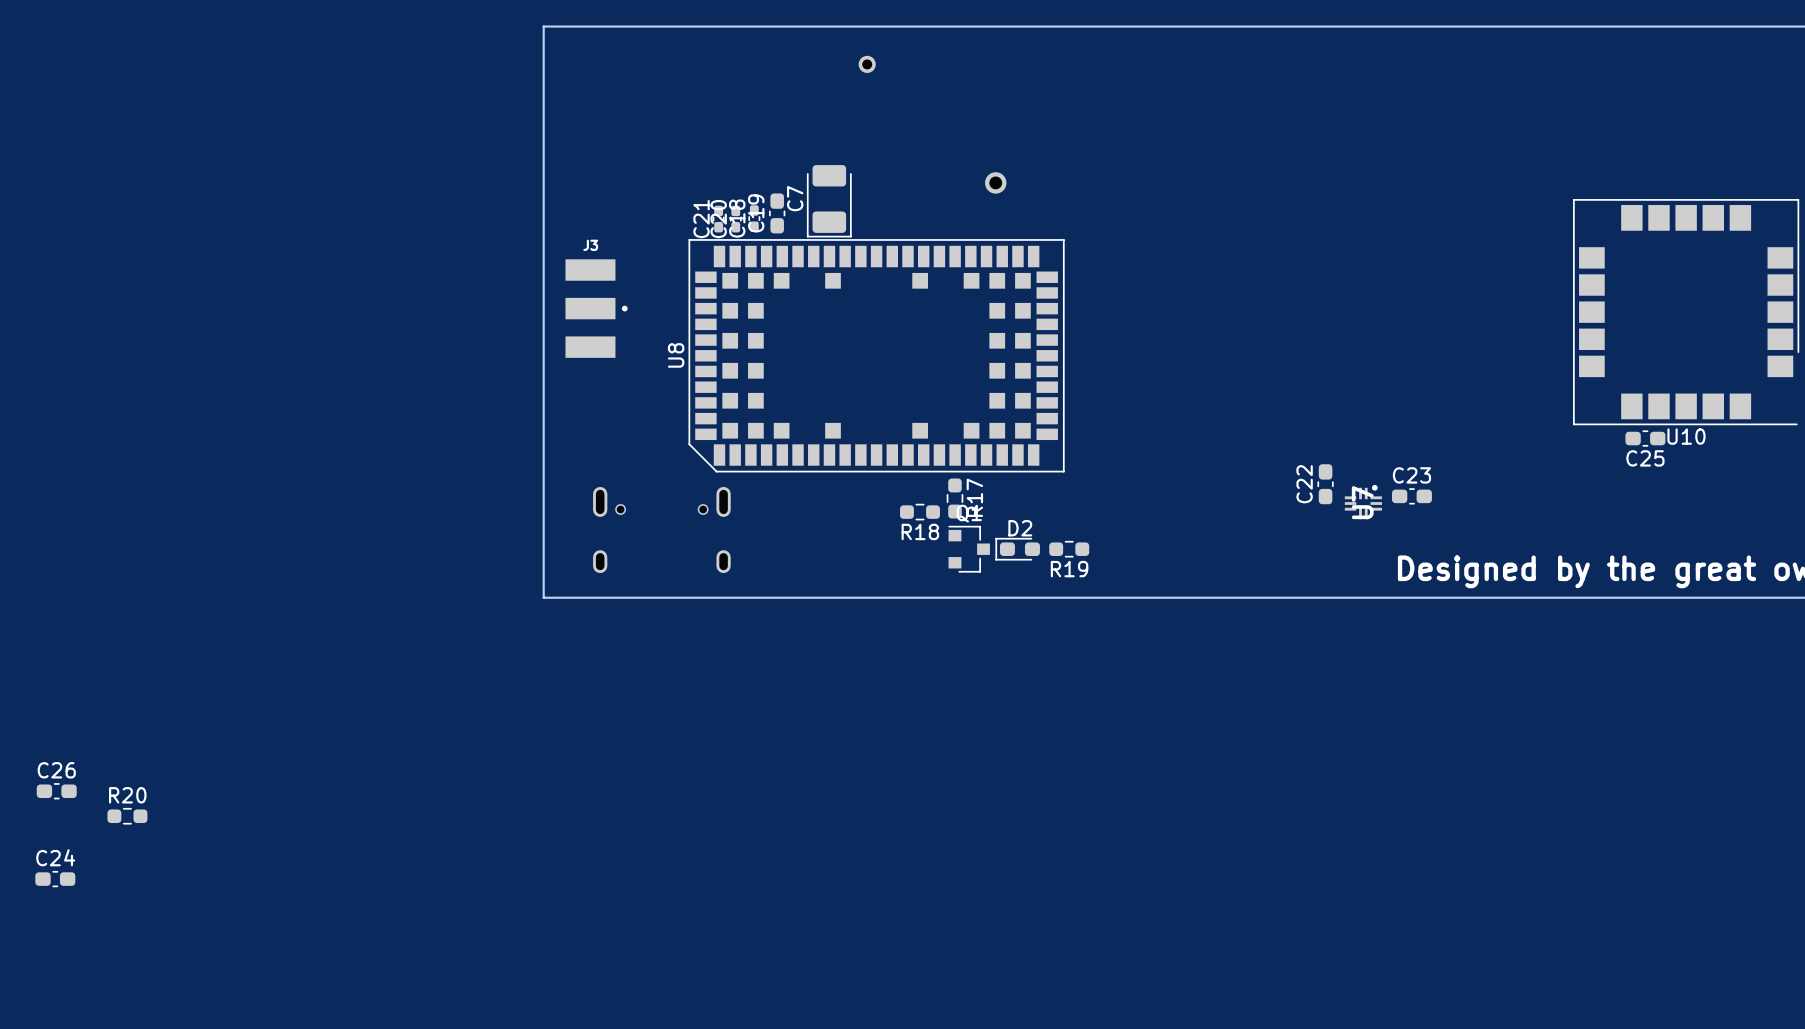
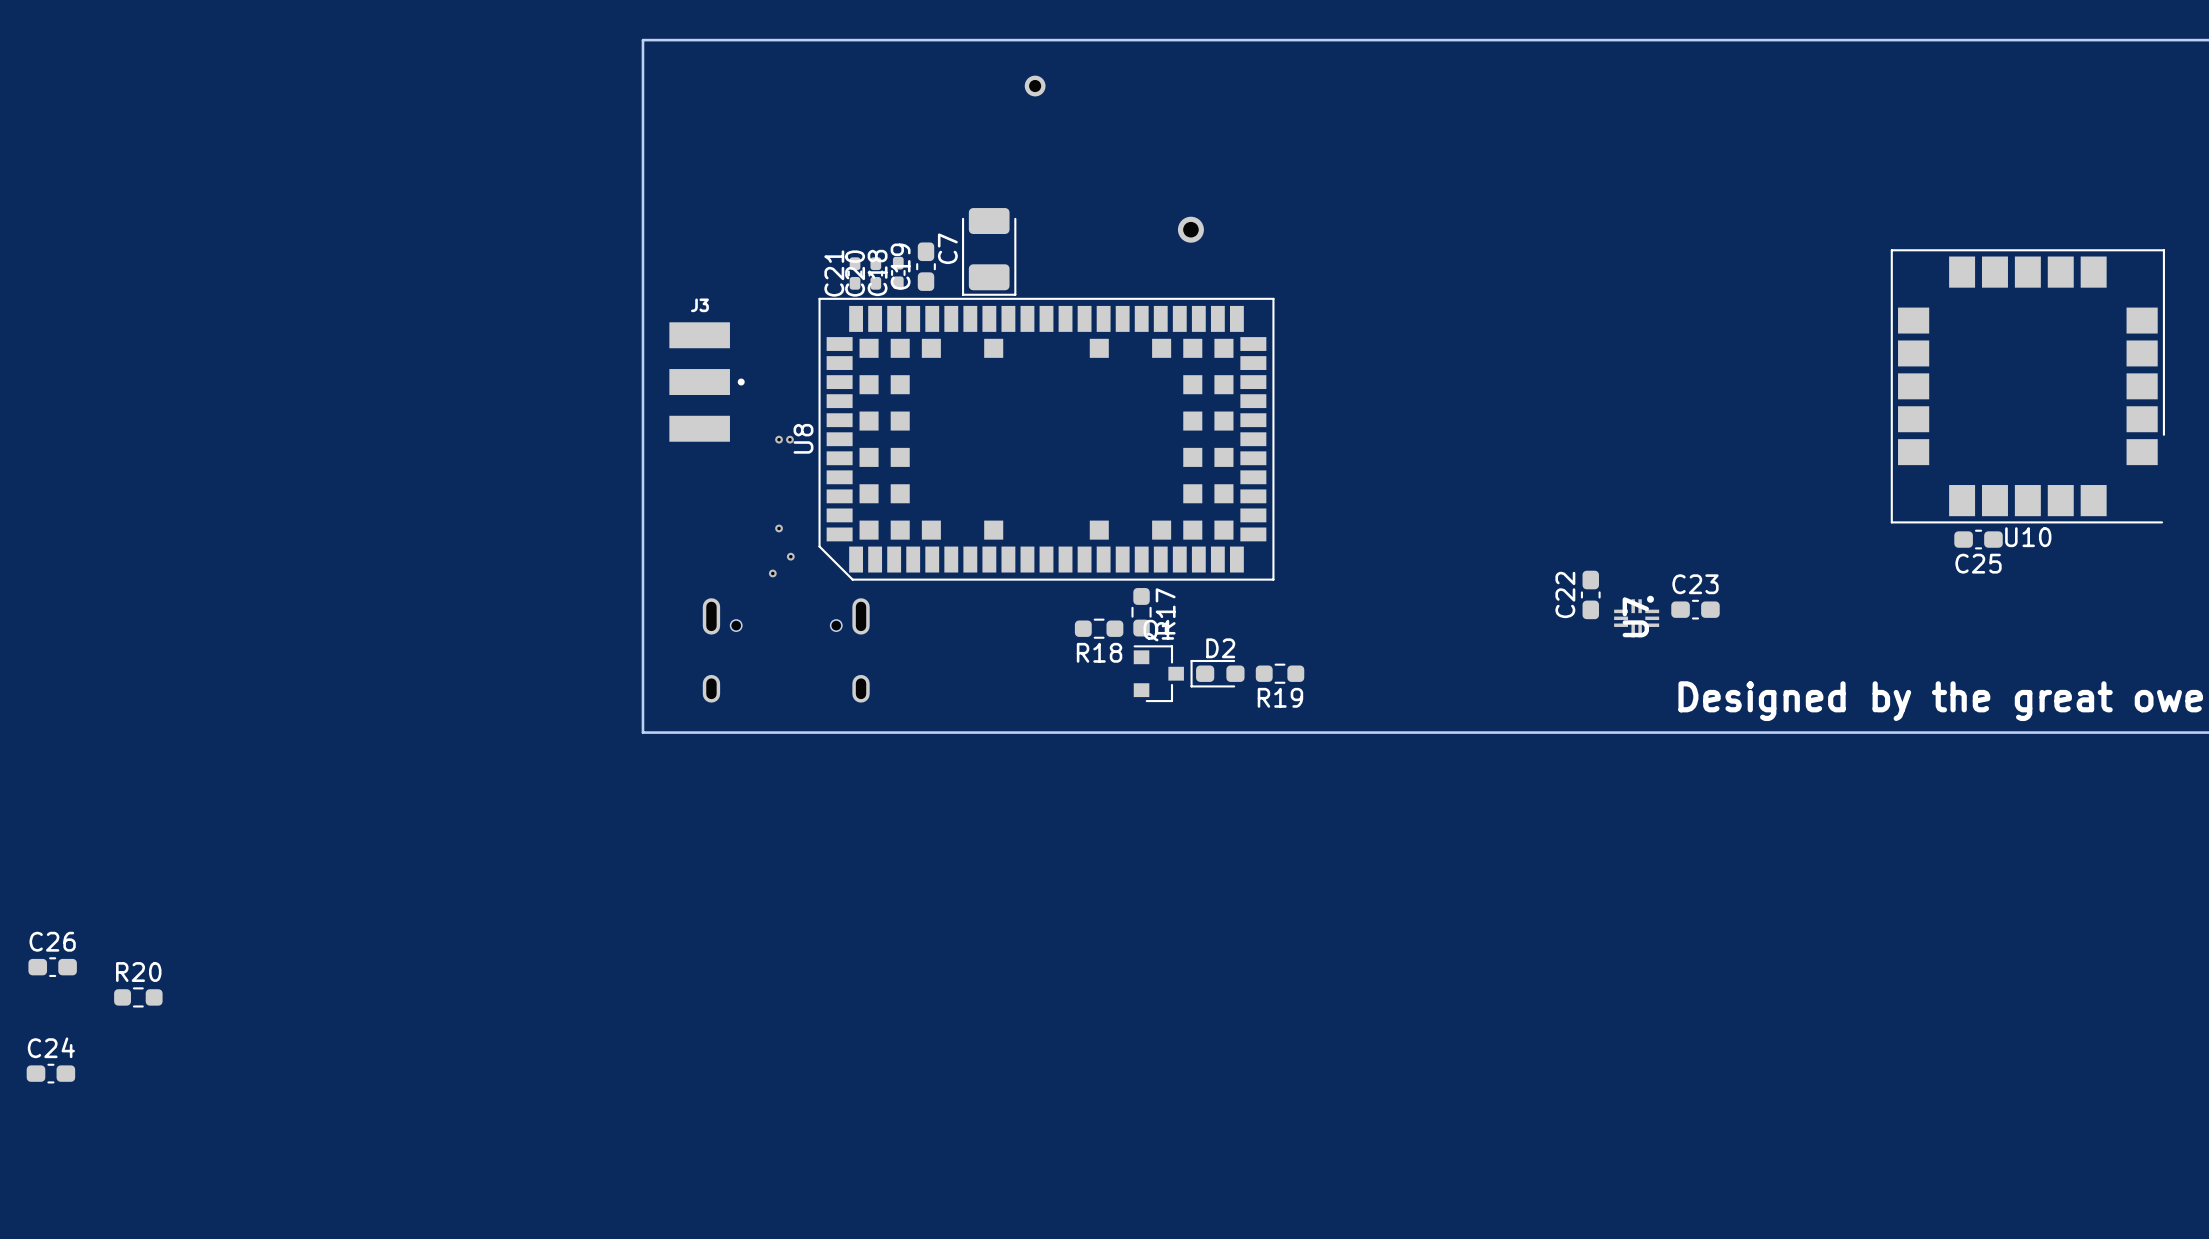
via: none -> (779, 439)
via: none -> (789, 439)
via: none -> (779, 528)
via: none -> (790, 556)
via: none -> (772, 573)

